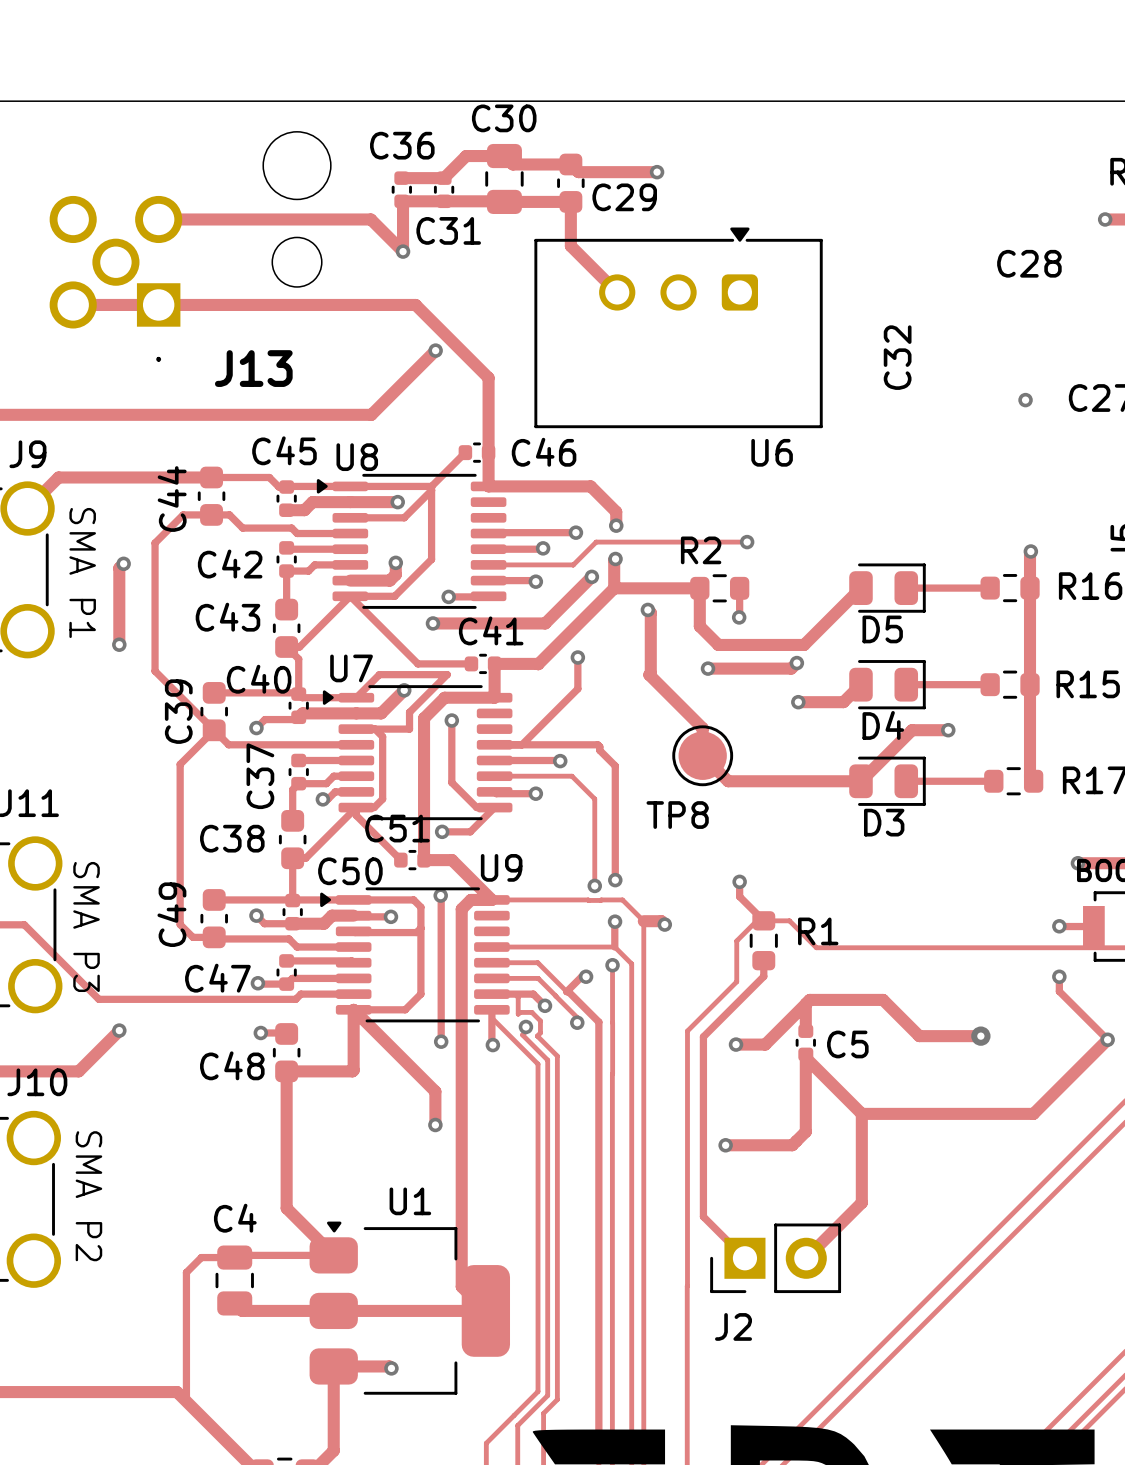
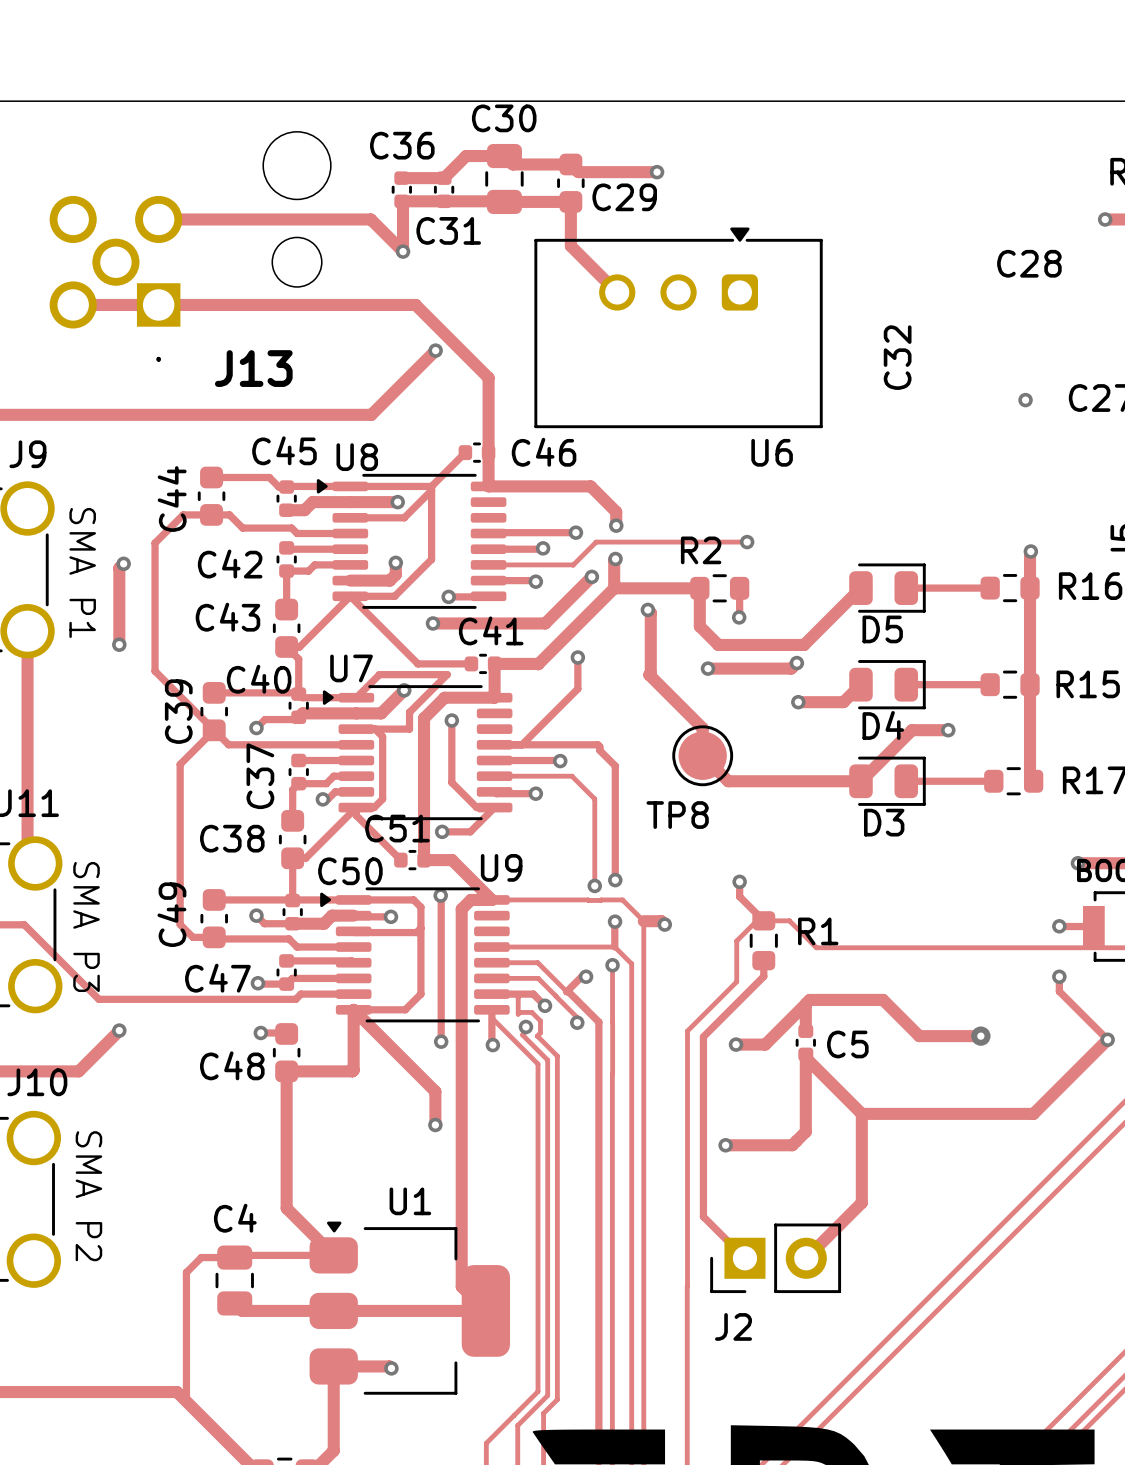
track: (211, 477) (58, 477) (27, 508) -> none
track: none -> (27, 631) (27, 855)

